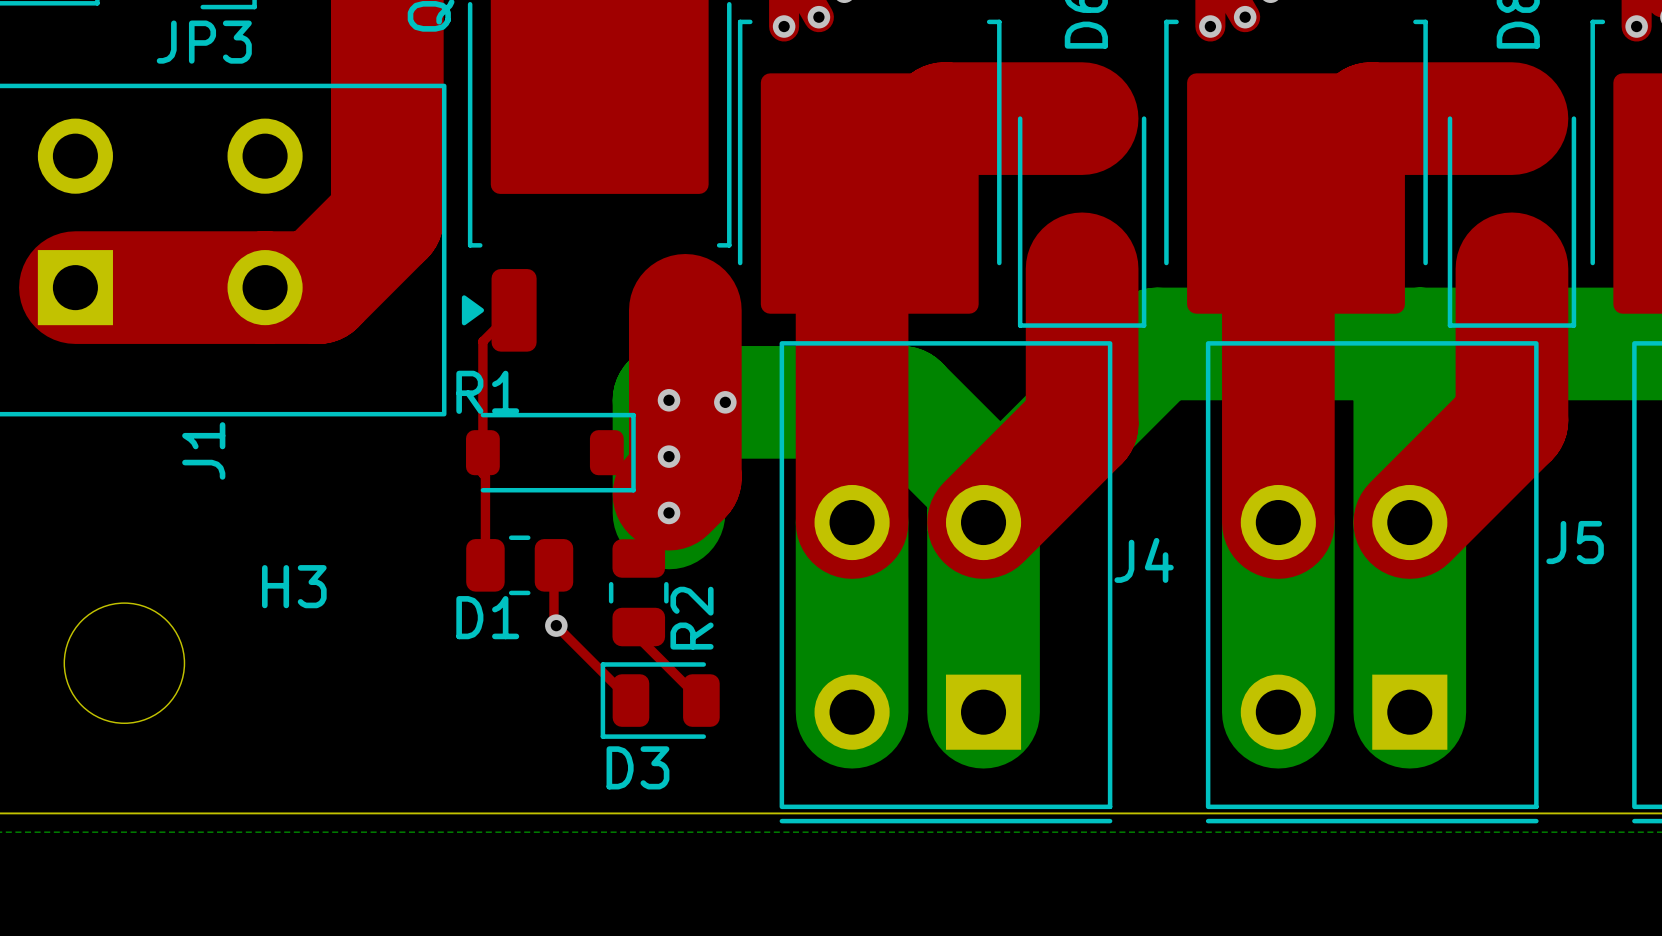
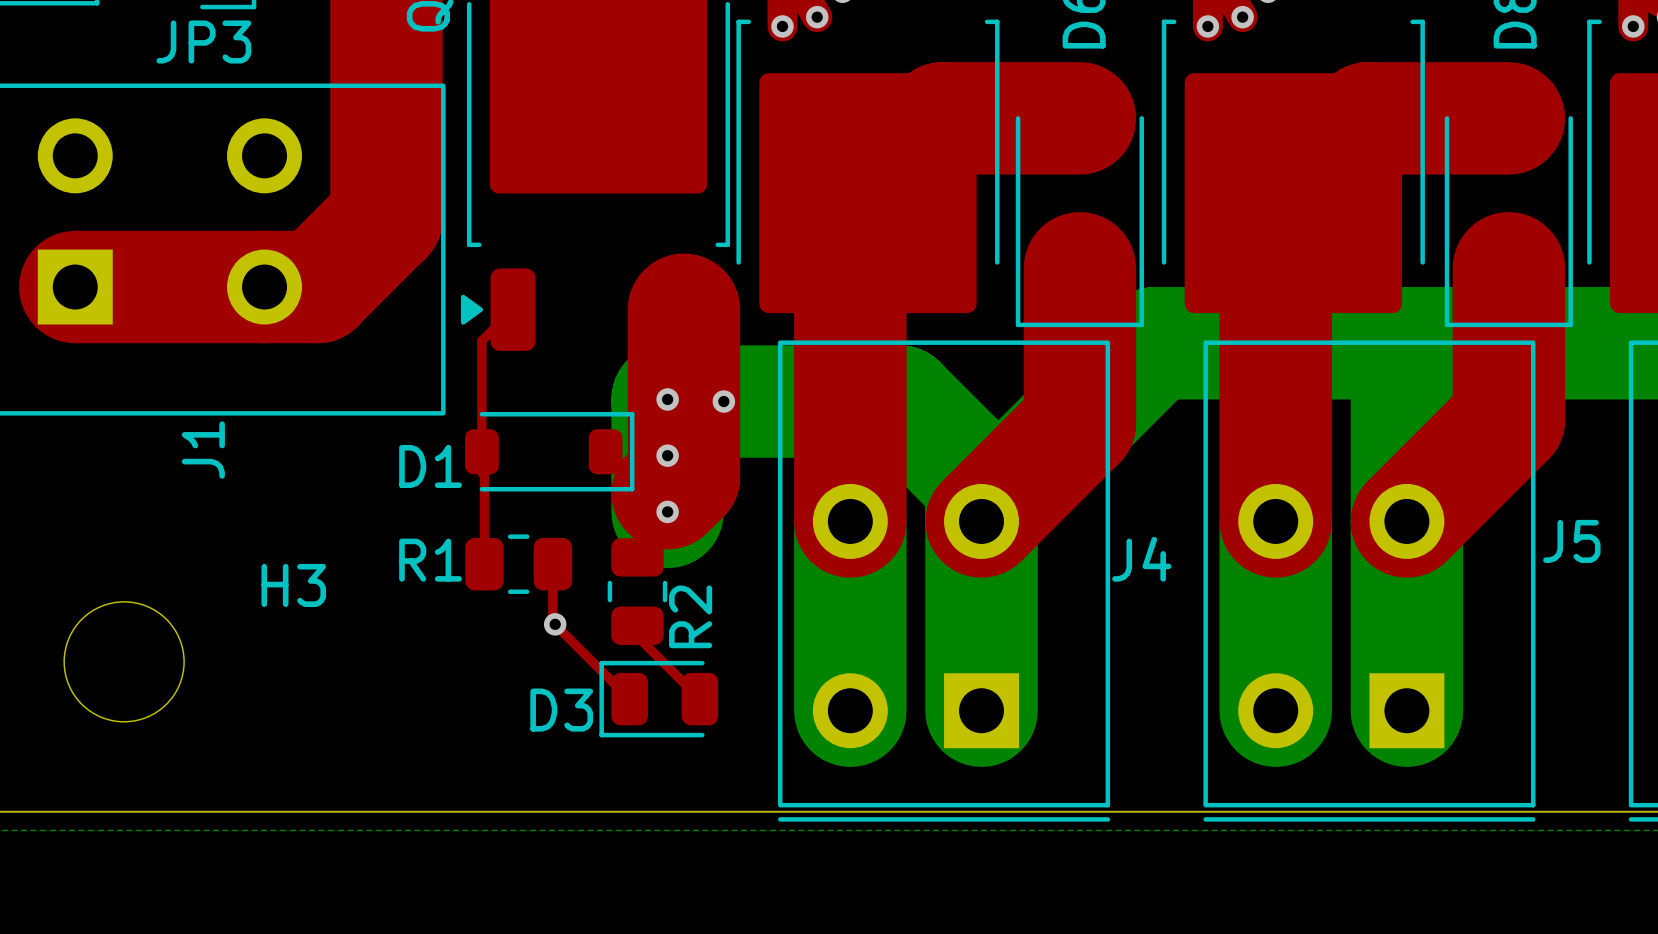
R1 name position: R1 (487, 392) -> R1 (430, 560)
D1 name position: D1 (487, 617) -> D1 (430, 466)
D3 name position: D3 (637, 767) -> D3 (561, 710)

